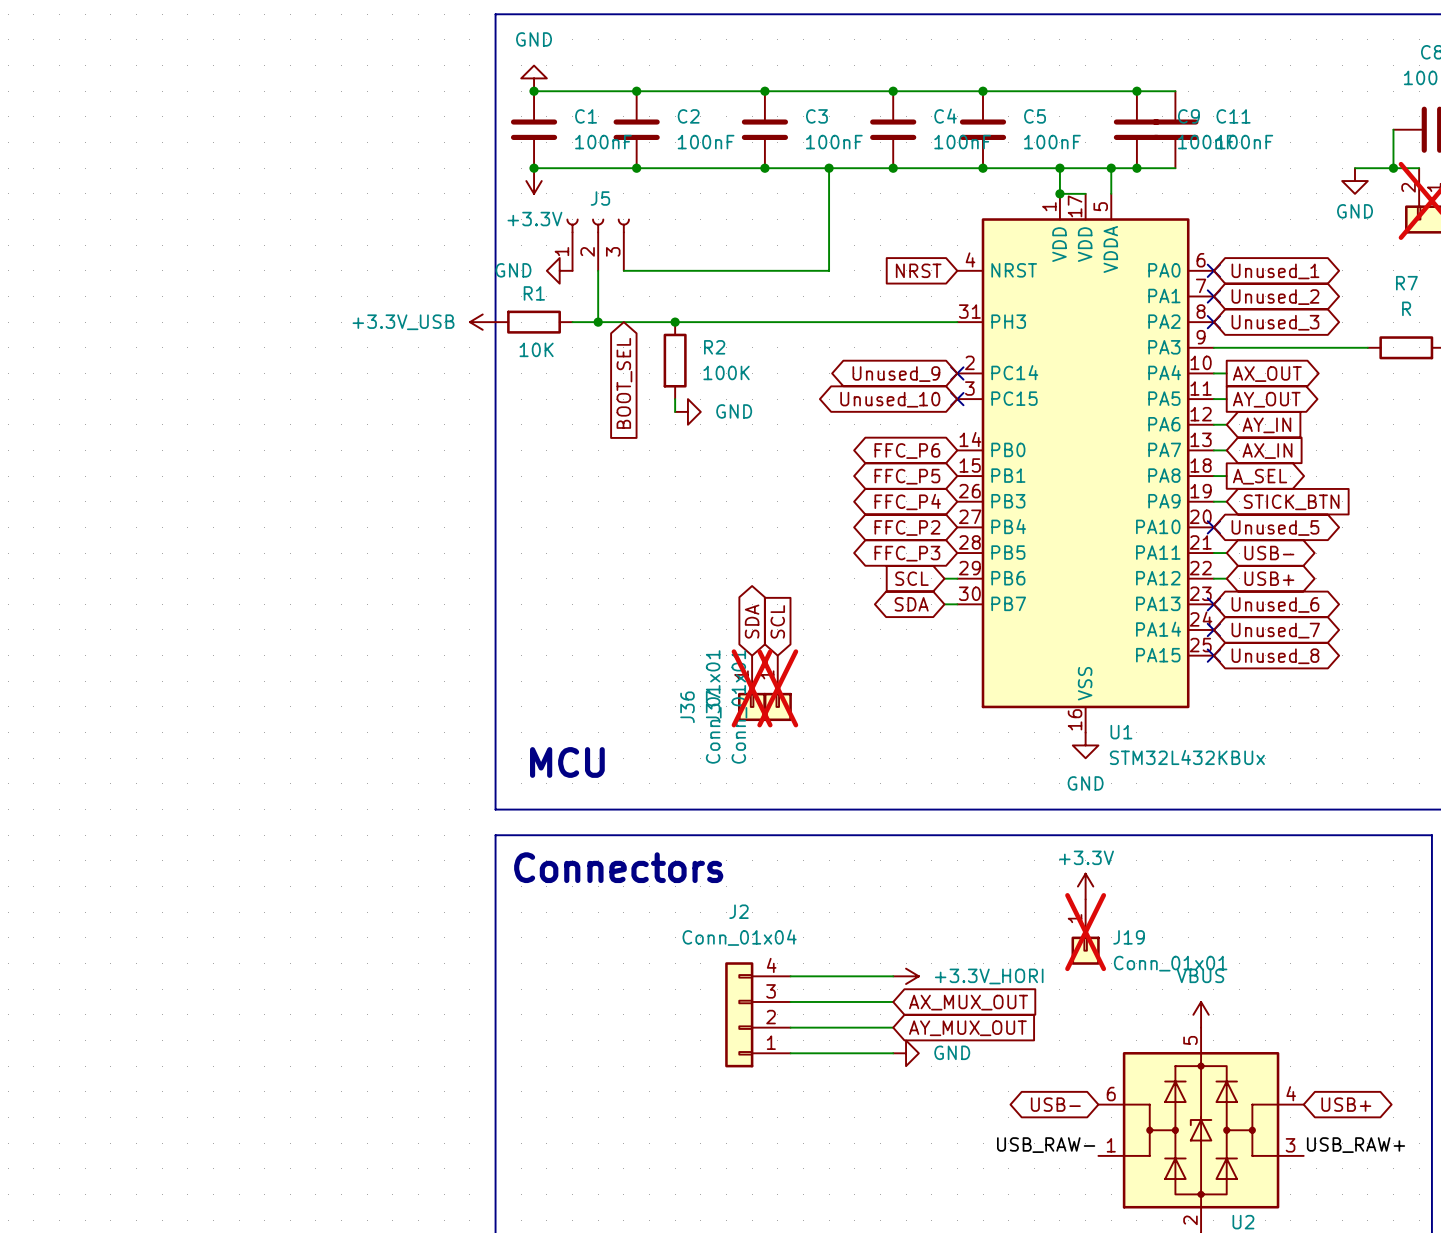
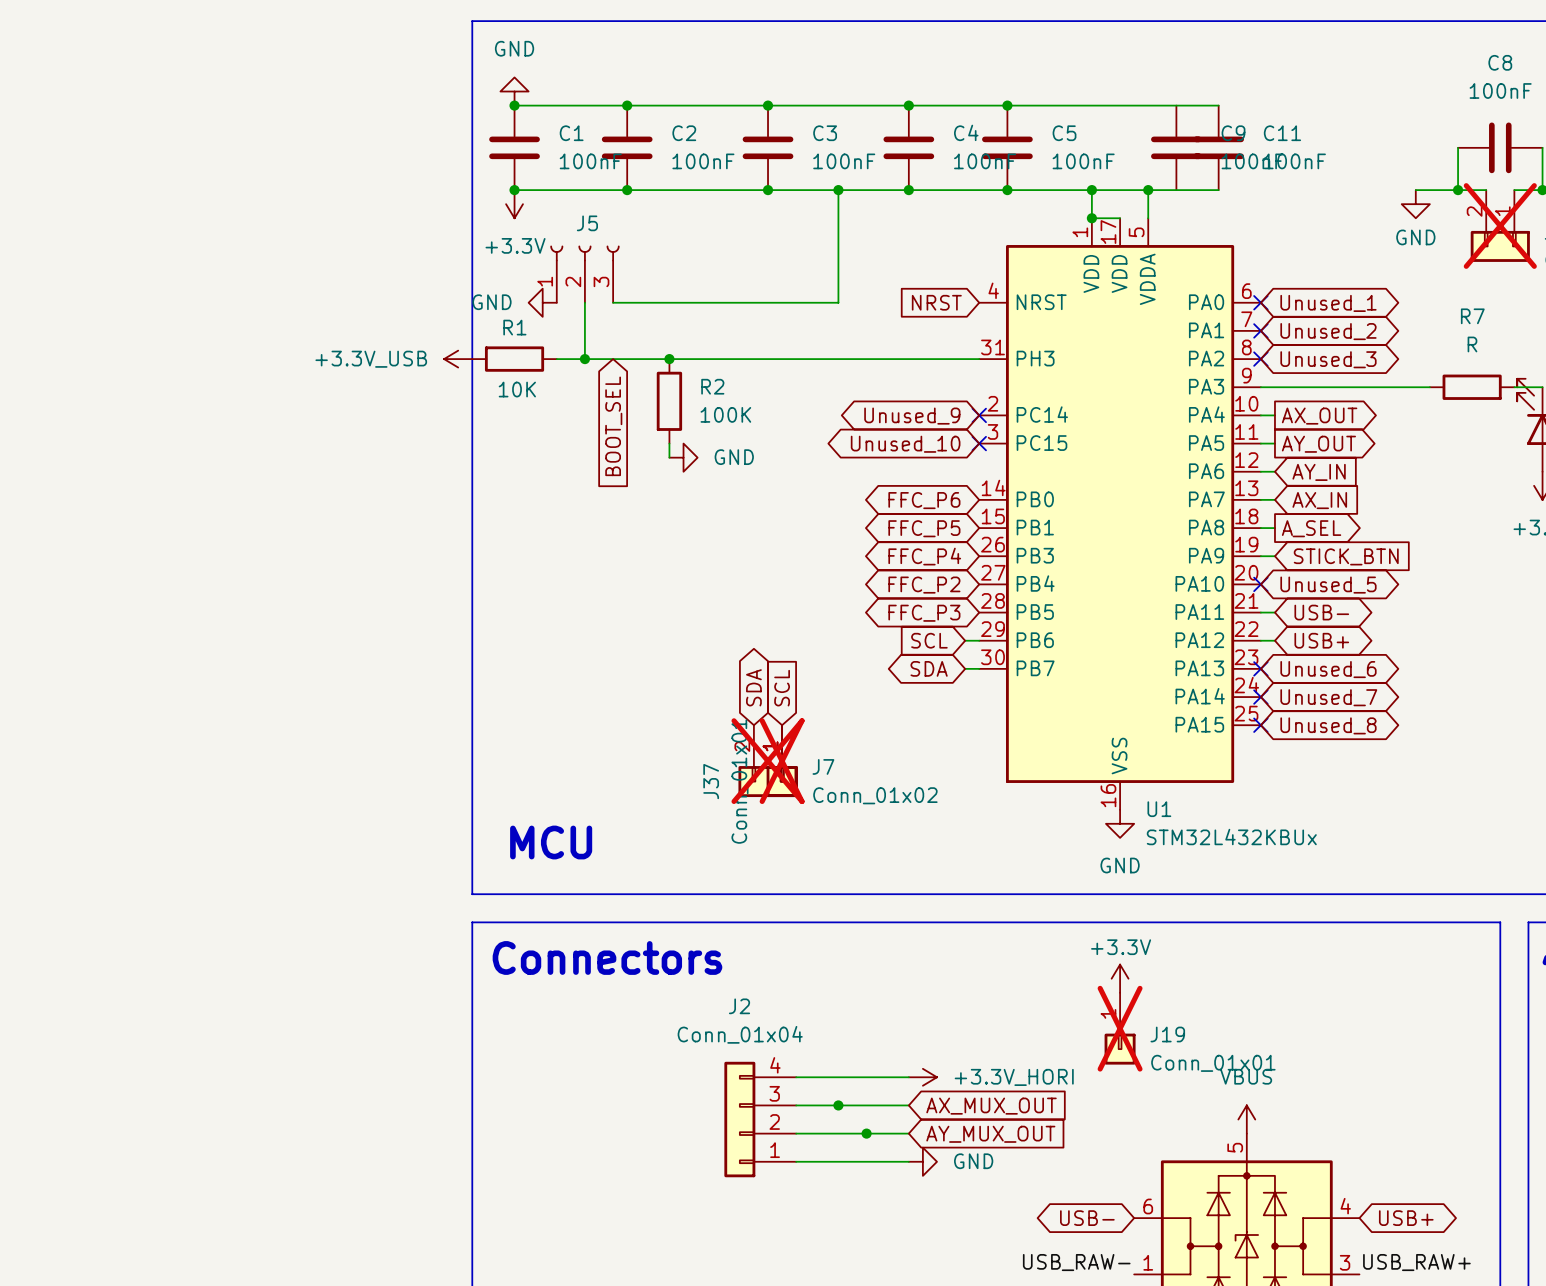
junction: (1136, 91) -> none
junction: (1136, 168) -> none
J36: Conn_01x01 (752, 688) -> none
J7: none -> Conn_01x02 (768, 761)
junction: none -> (838, 1105)
junction: none -> (866, 1133)

